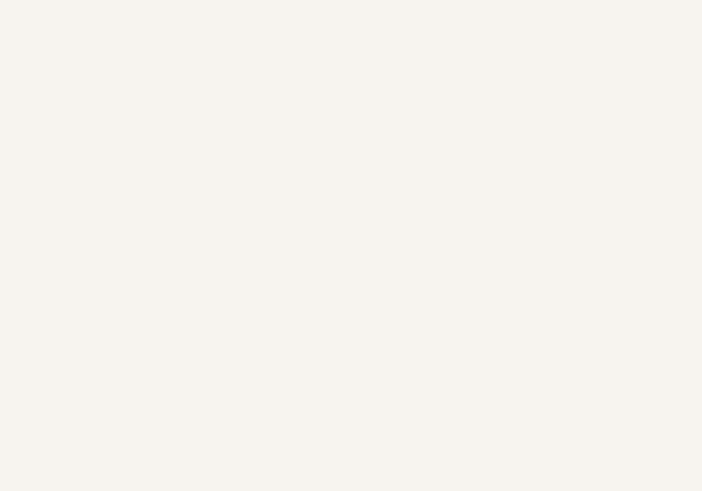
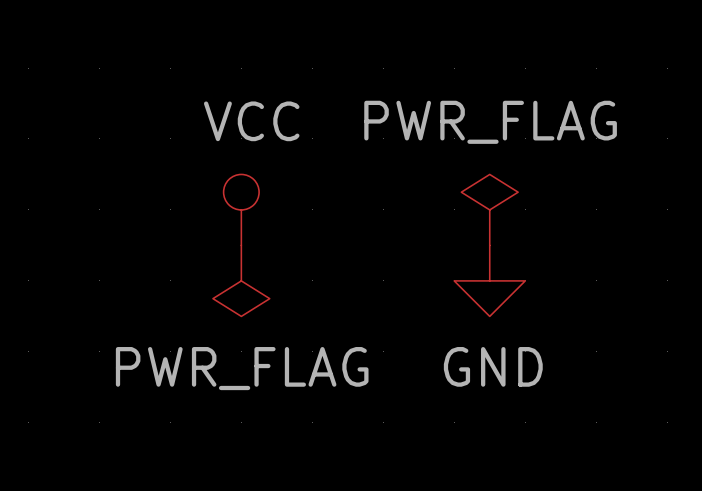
power symbol: none -> VCC (241, 209)
power symbol: none -> PWR_FLAG (489, 209)
power symbol: none -> PWR_FLAG (241, 280)
power symbol: none -> GND (489, 280)

